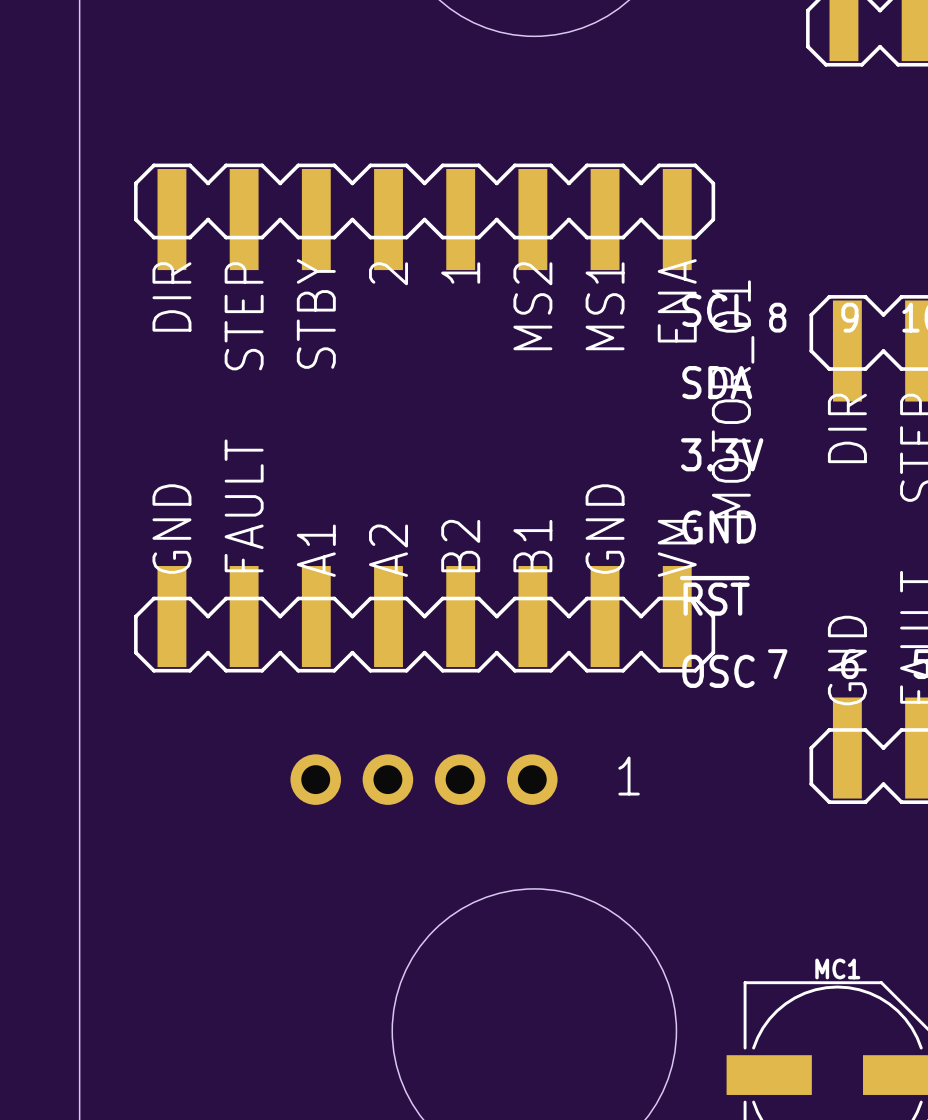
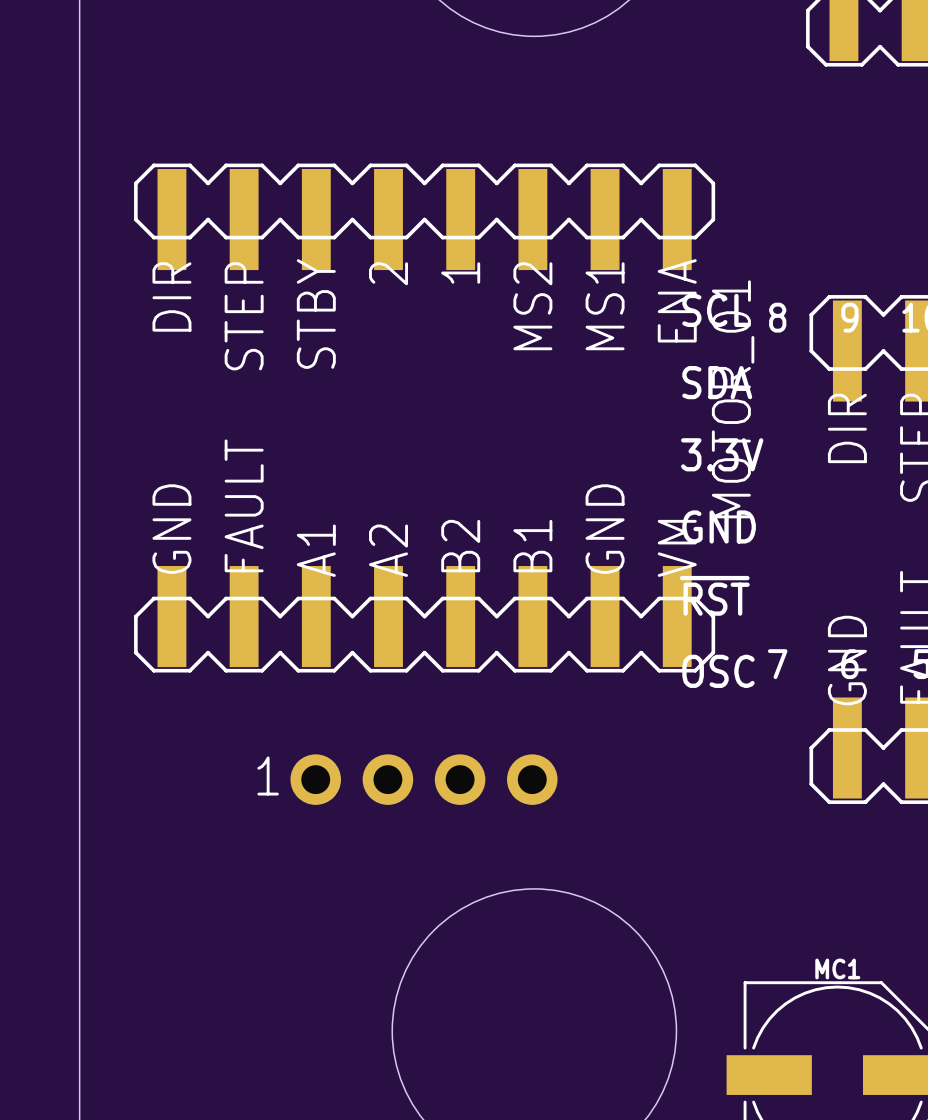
text position: 1 (629, 776) -> 1 (268, 776)

